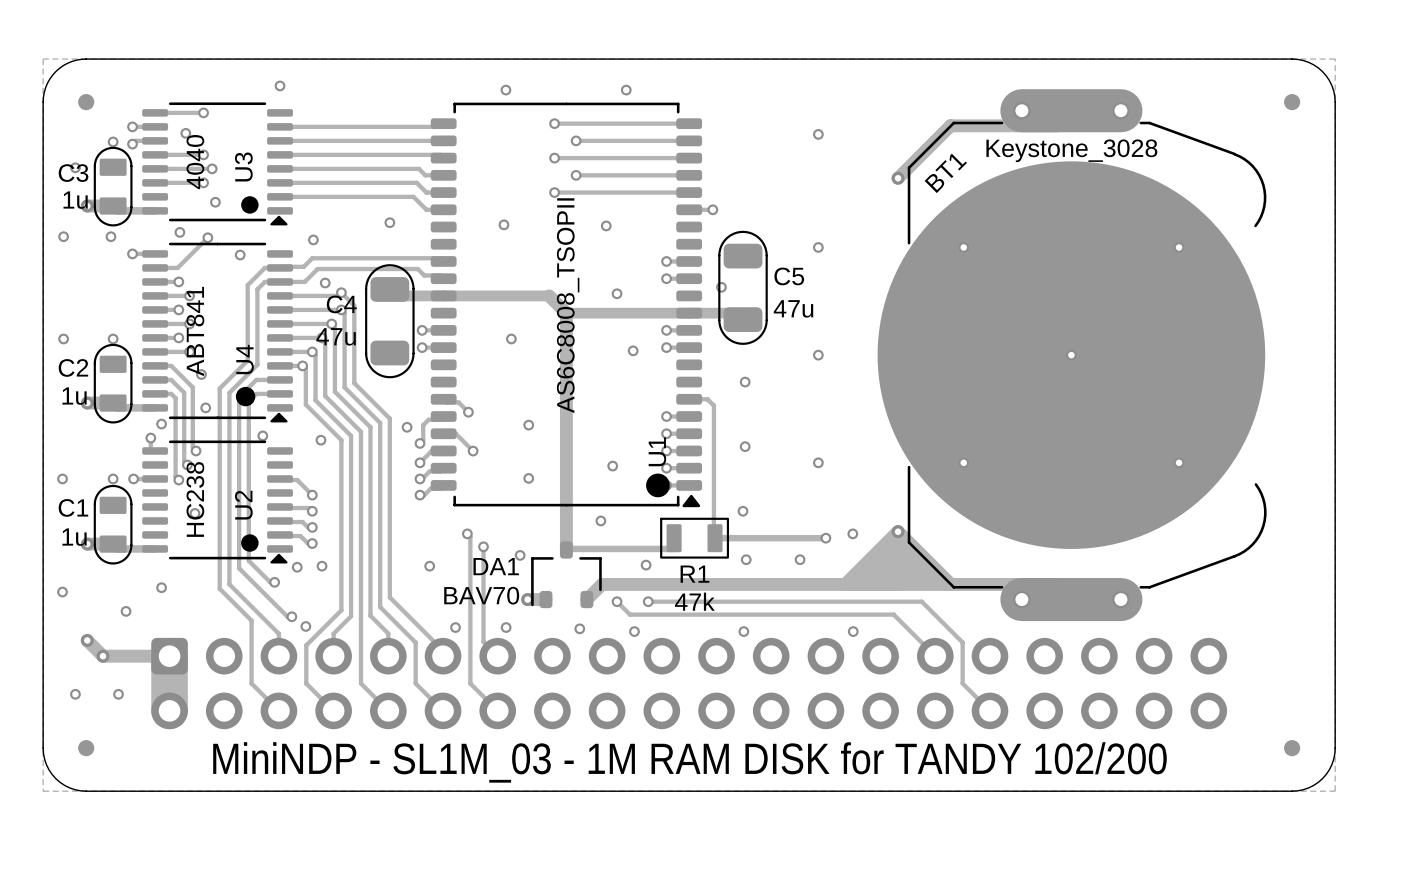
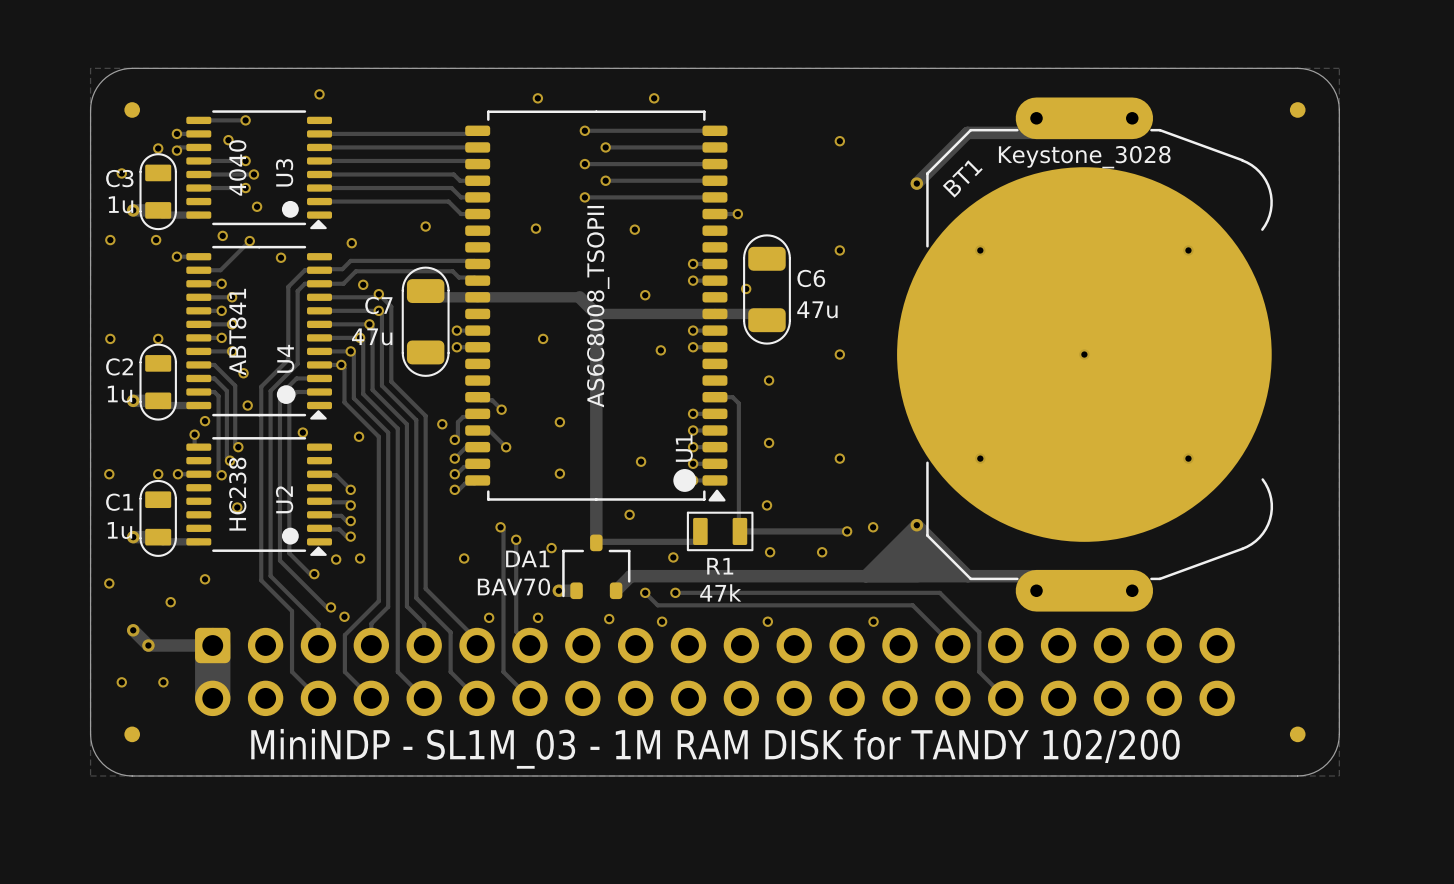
C5 name: C5 (789, 276) -> C6 (811, 278)
C4 name: C4 (341, 304) -> C7 (378, 305)

